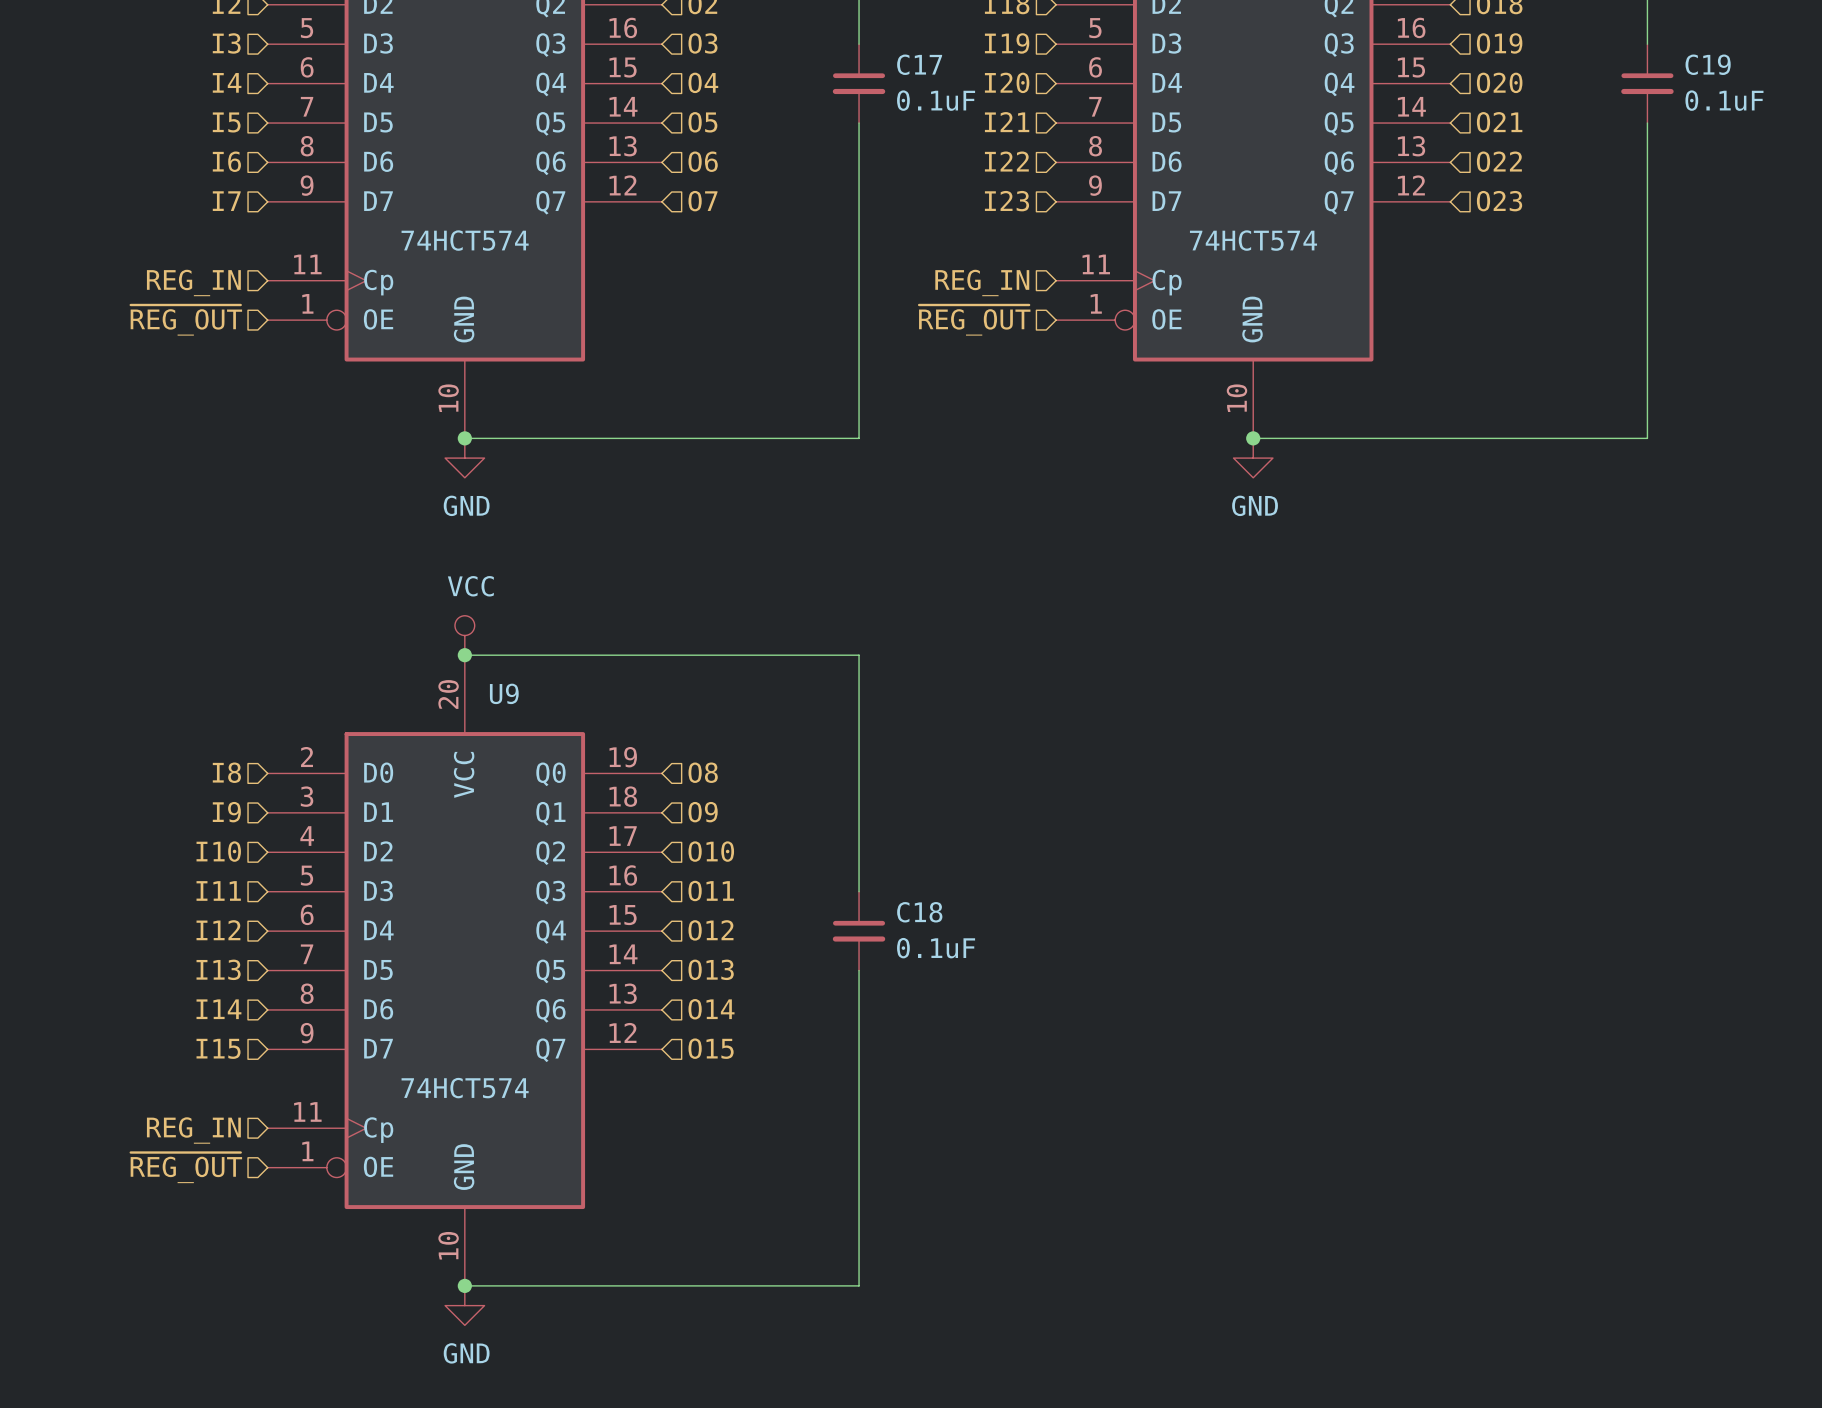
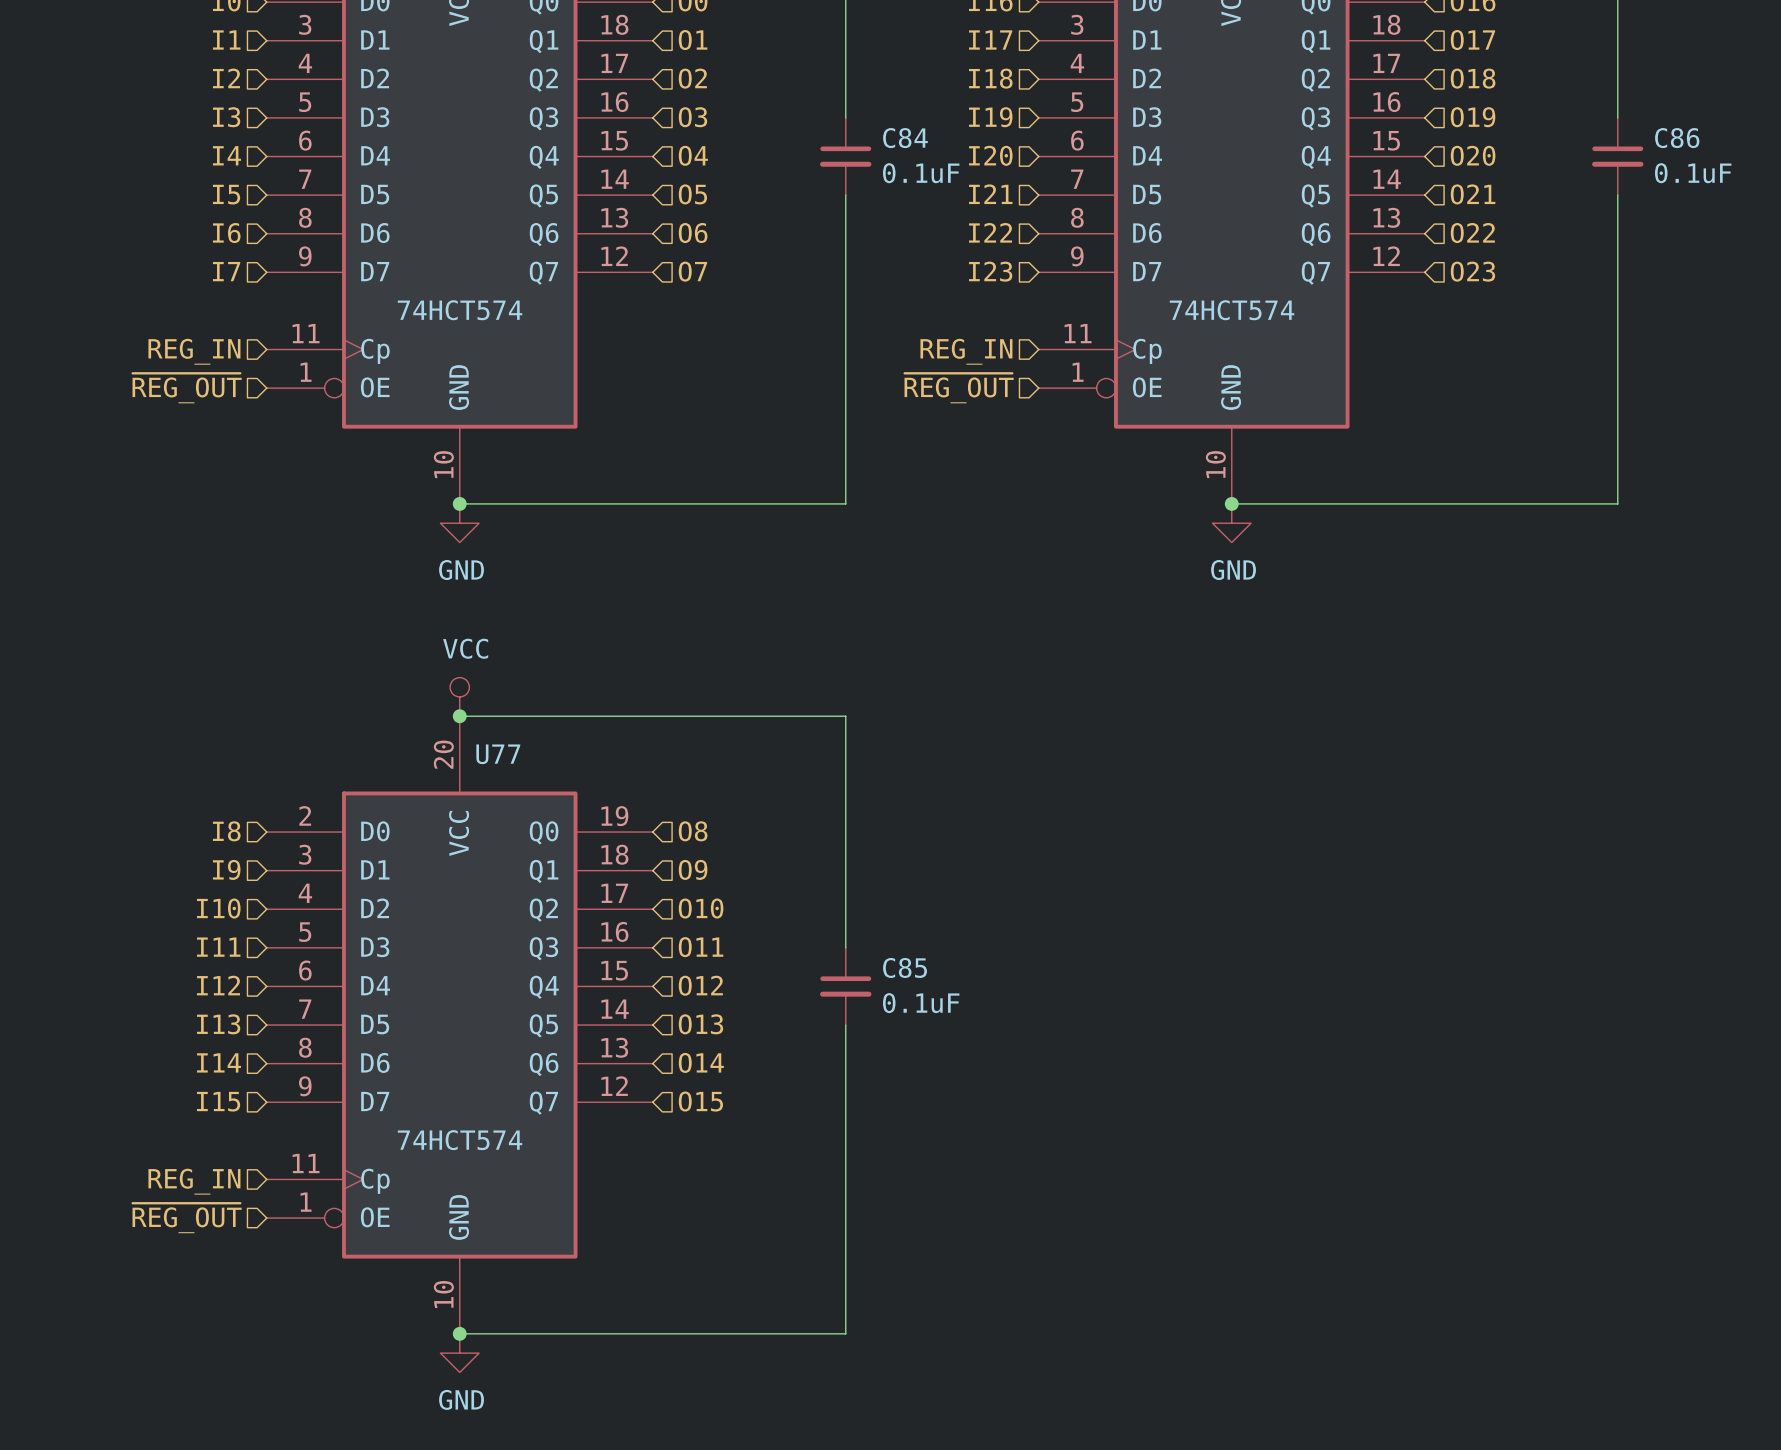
C17 name: C17 (919, 64) -> C84 (905, 138)
C19 name: C19 (1708, 64) -> C86 (1677, 138)
U9 name: U9 (504, 693) -> U77 (498, 754)
C18 name: C18 (919, 912) -> C85 (905, 967)

